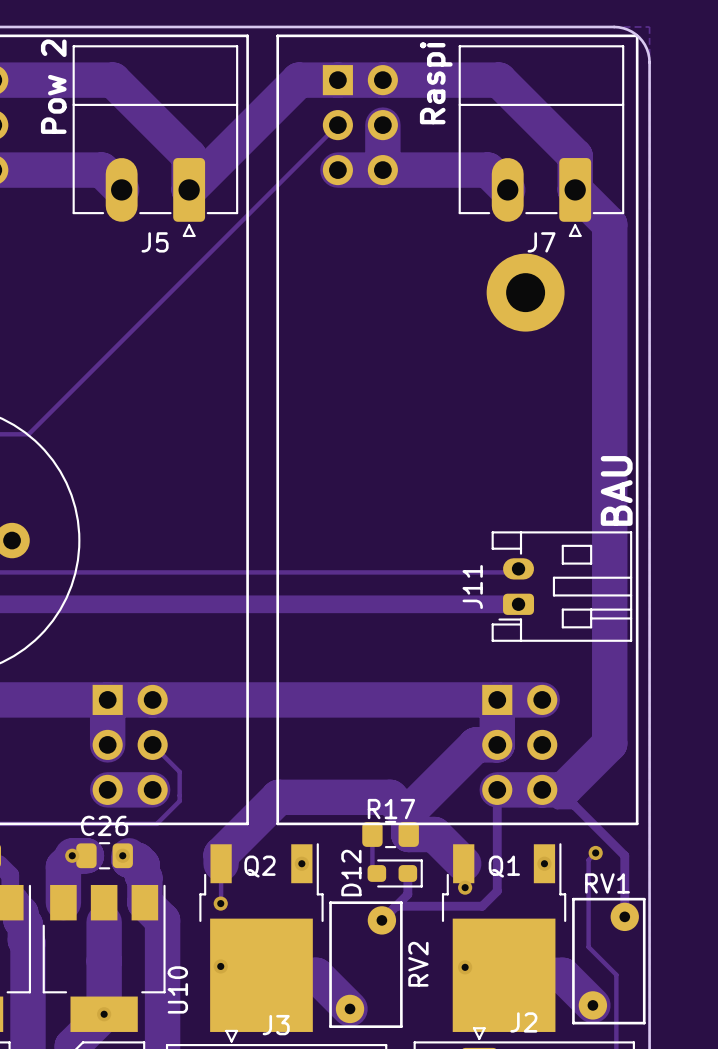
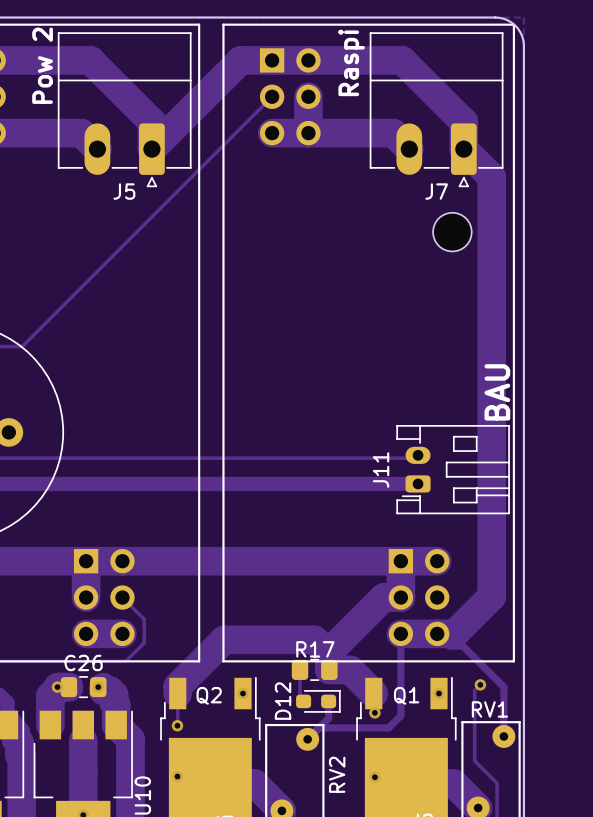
part: (525, 292) -> none
part: none -> (452, 232)

